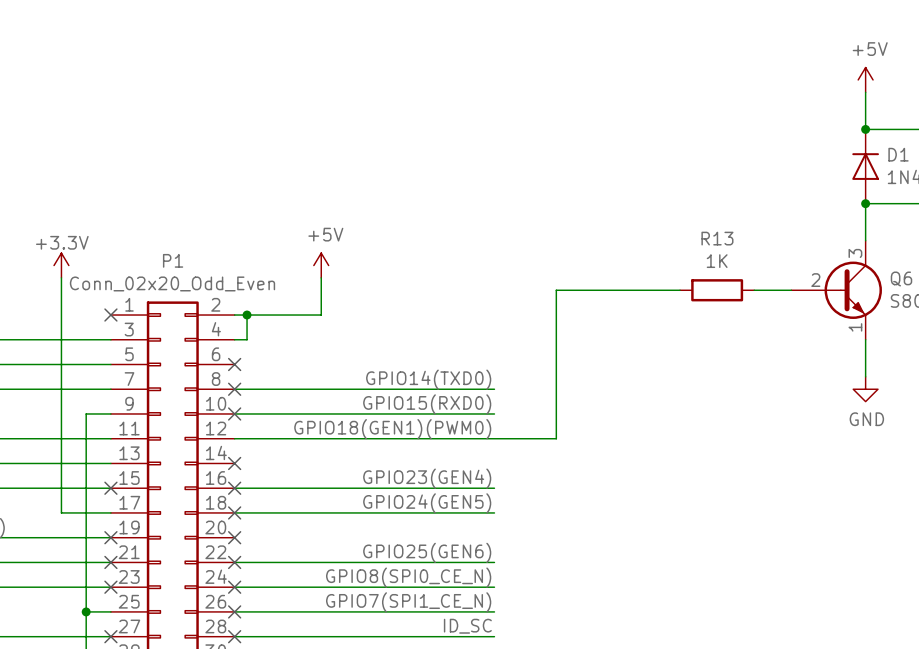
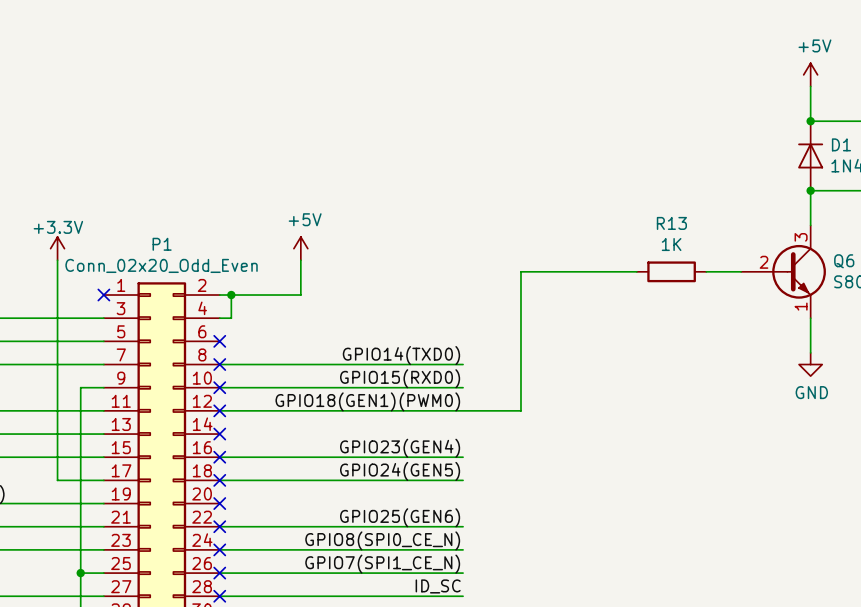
no-connect mark: none -> (219, 410)
no-connect mark: (110, 488) -> none
no-connect mark: (110, 537) -> none
no-connect mark: (110, 562) -> none
no-connect mark: (110, 587) -> none
no-connect mark: (110, 636) -> none

